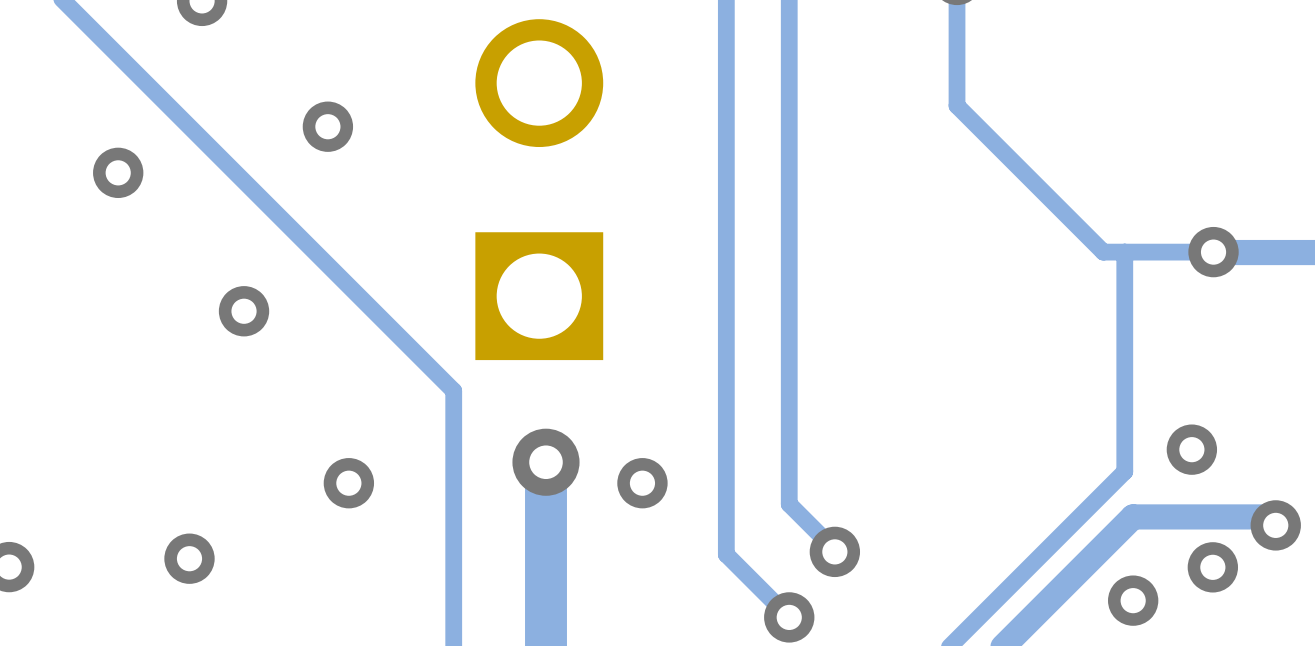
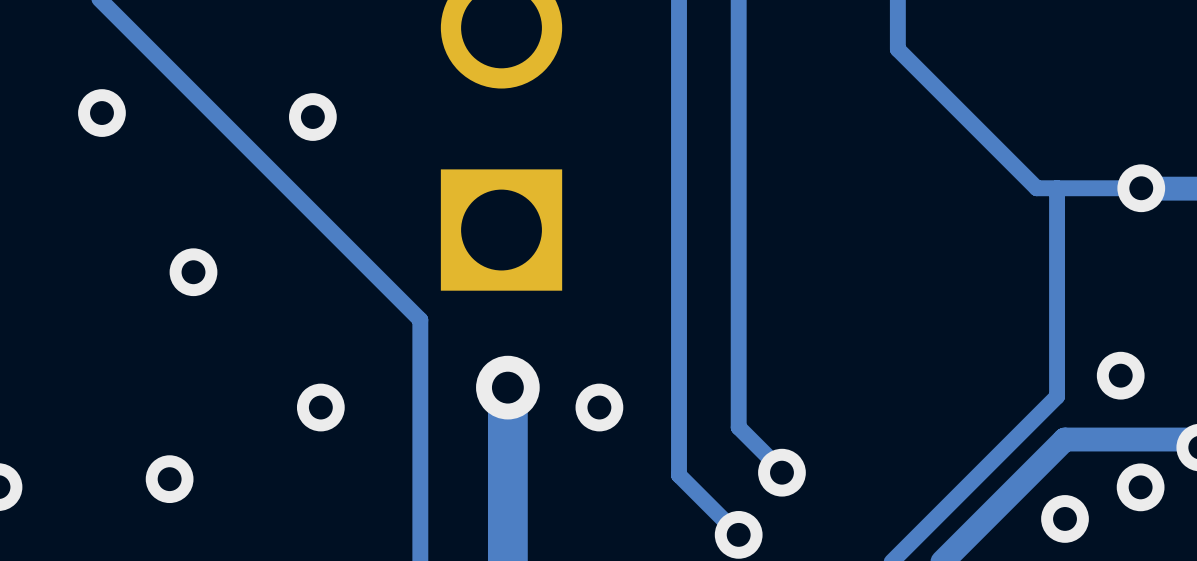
via position: (327, 126) -> (312, 117)
via position: (244, 311) -> (193, 272)

